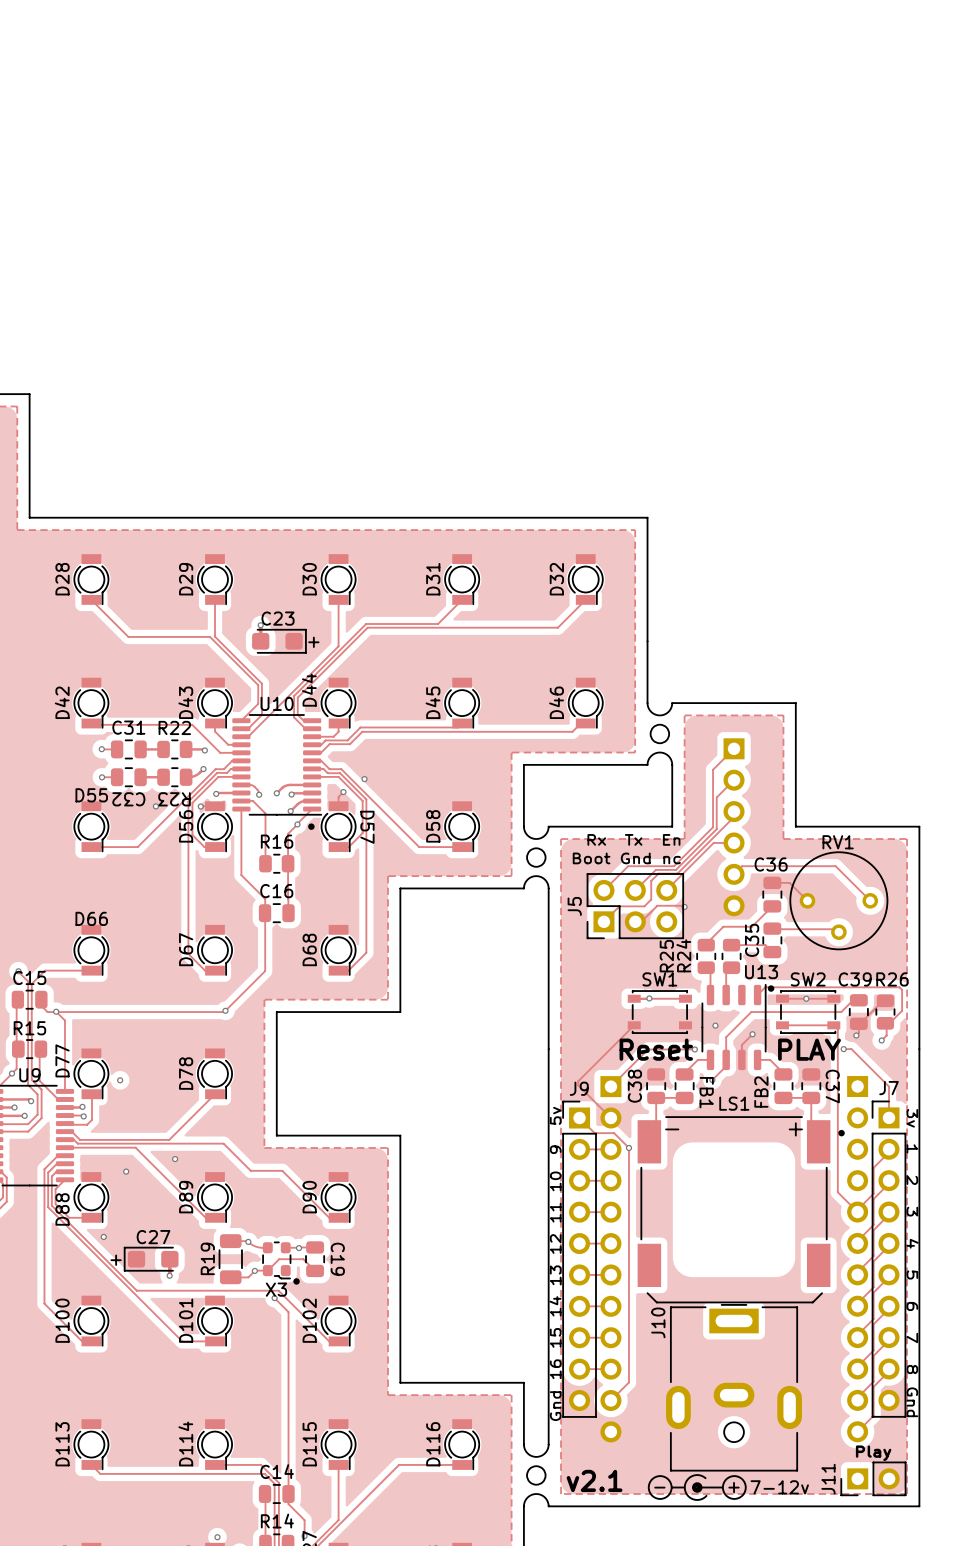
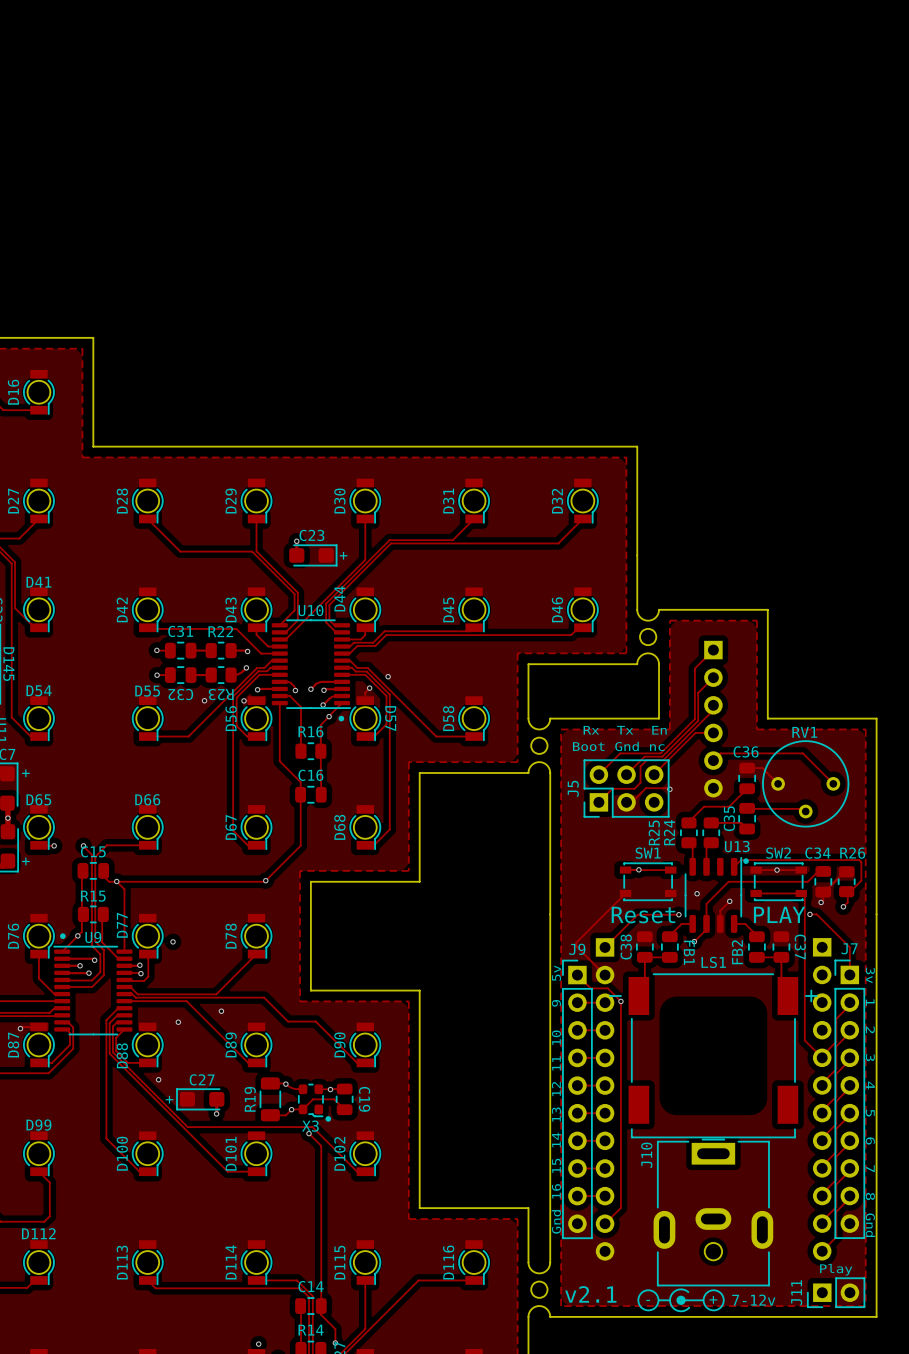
C39 name: C39 (855, 979) -> C34 (817, 853)
LS1 footprint: [637, 1116, 831, 1304] -> [609, 973, 818, 1139]
drawing: [838, 1129, 845, 1137] -> none

